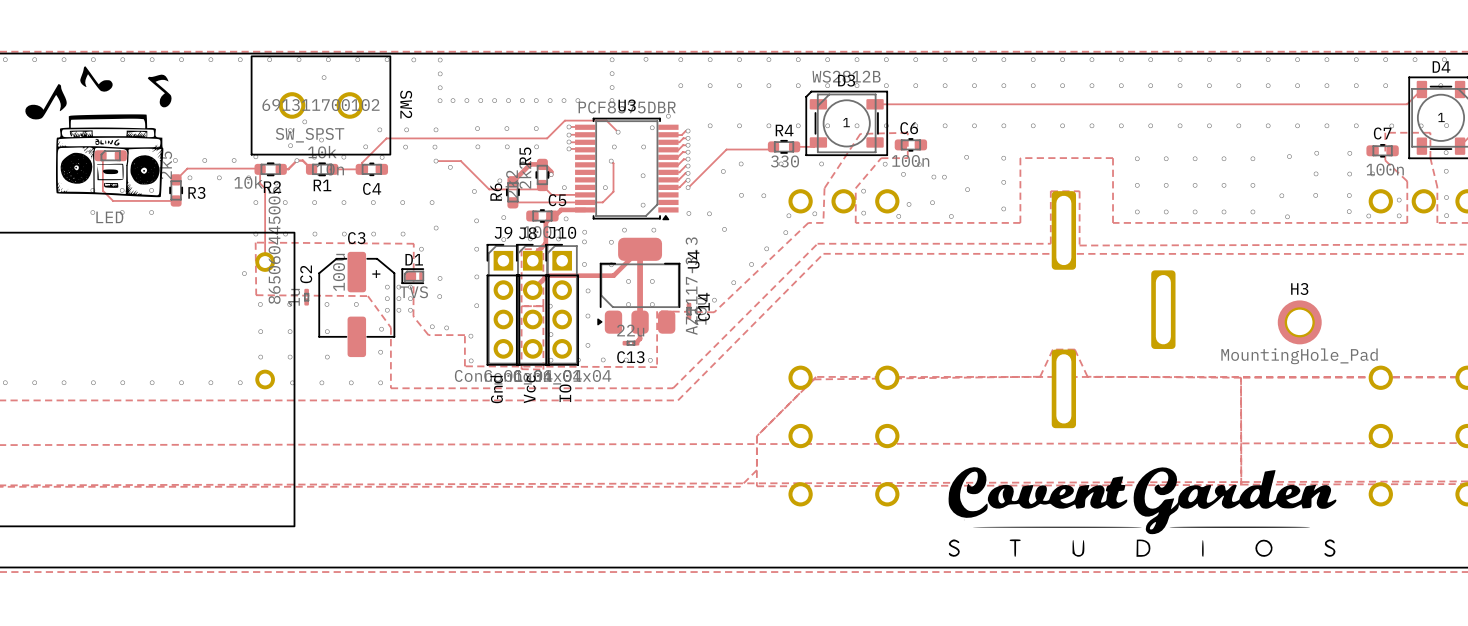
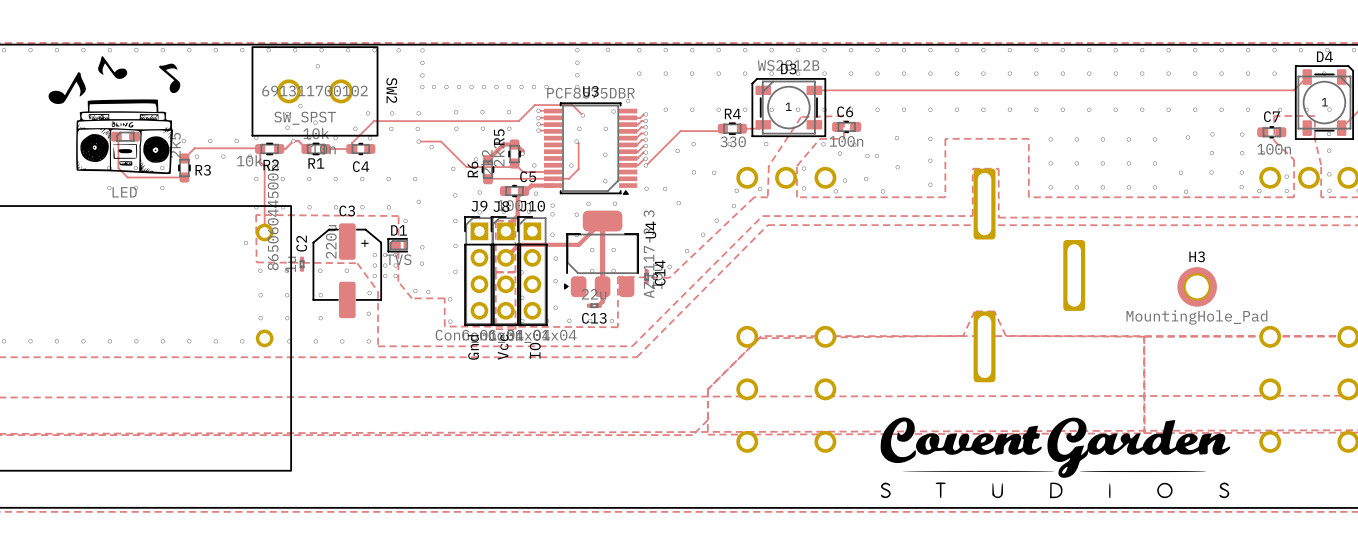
C3 value: 100u (339, 272) -> 220u (331, 241)

